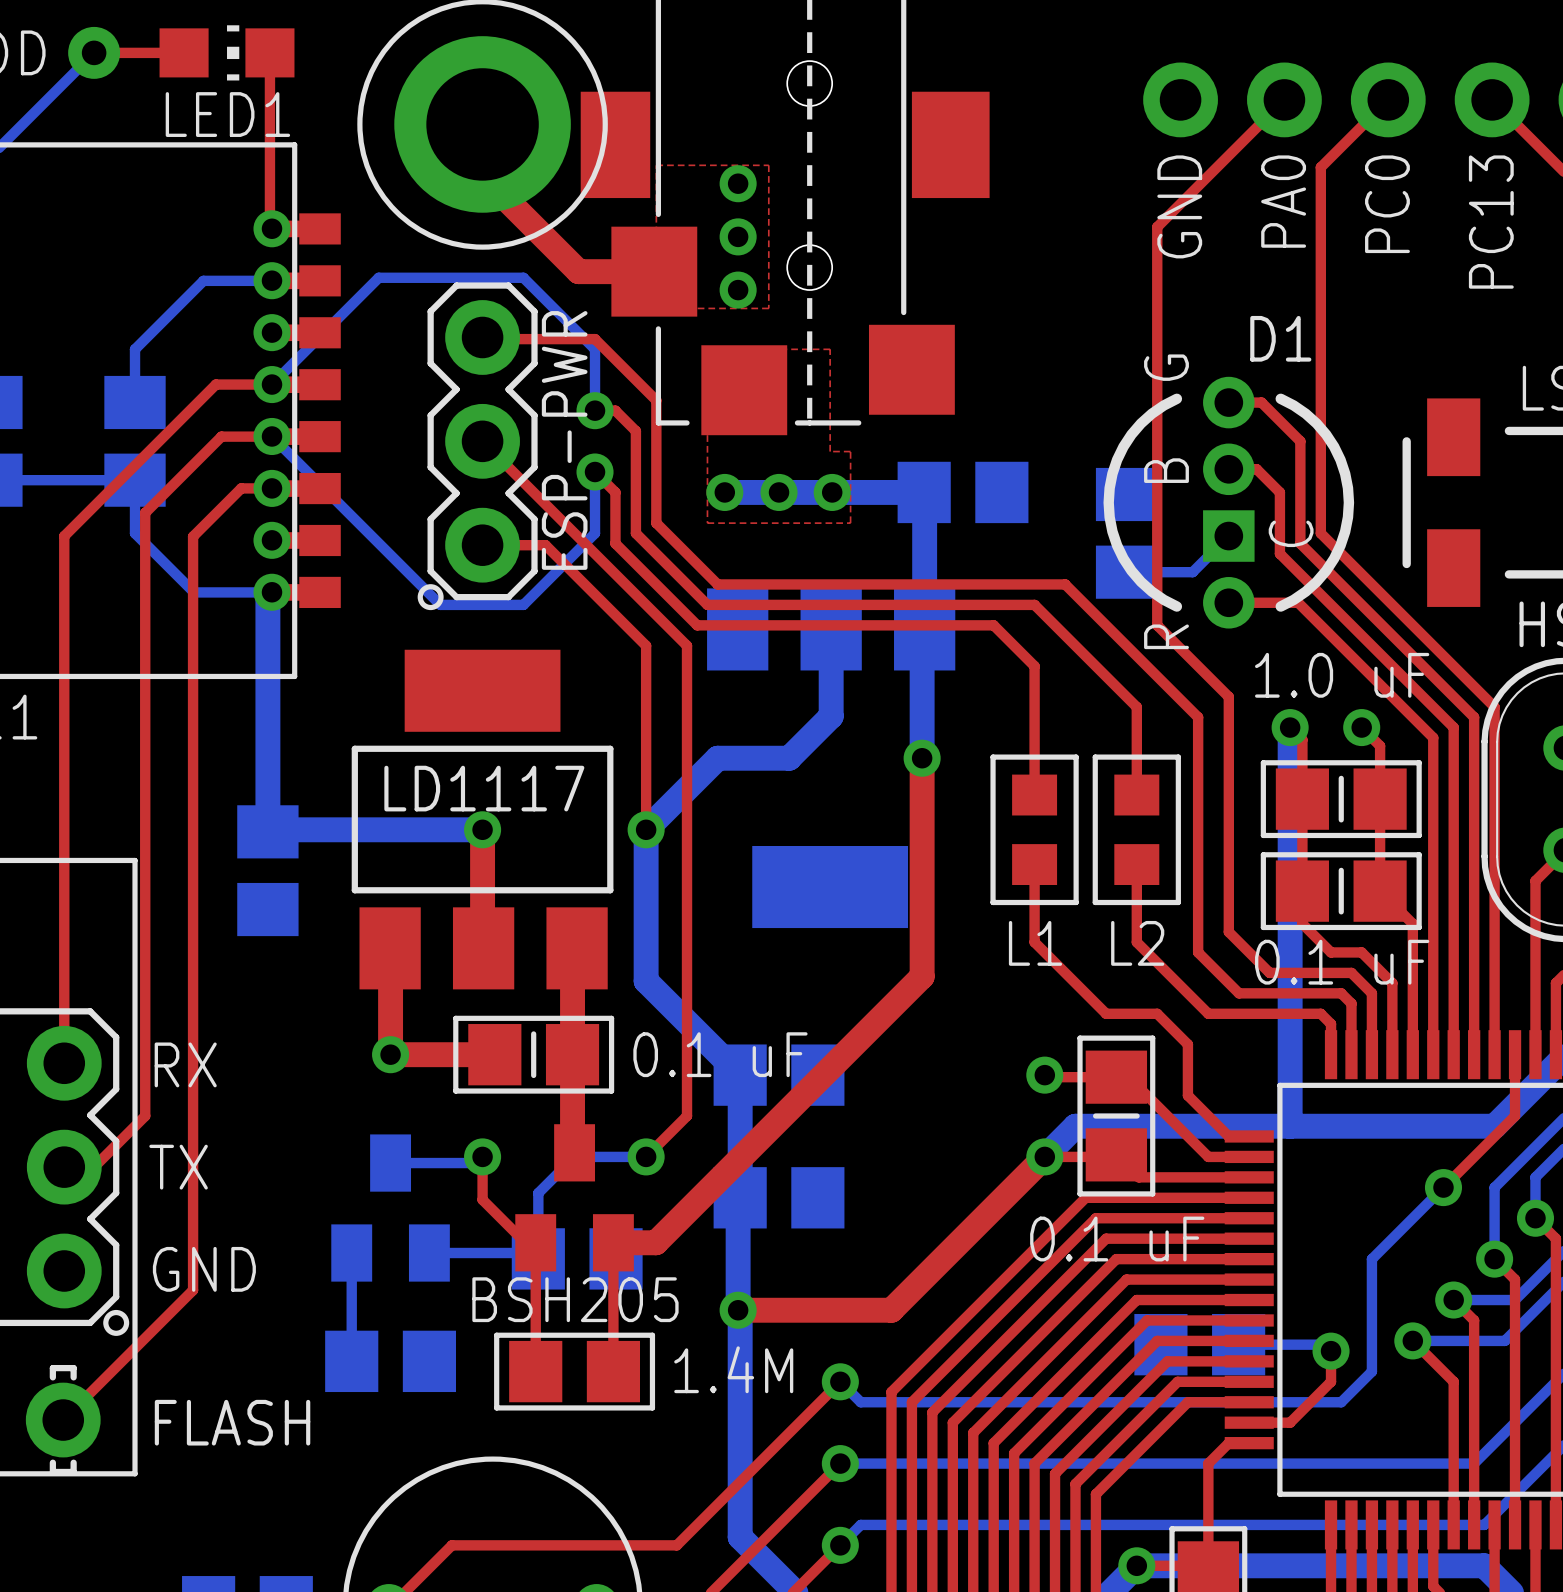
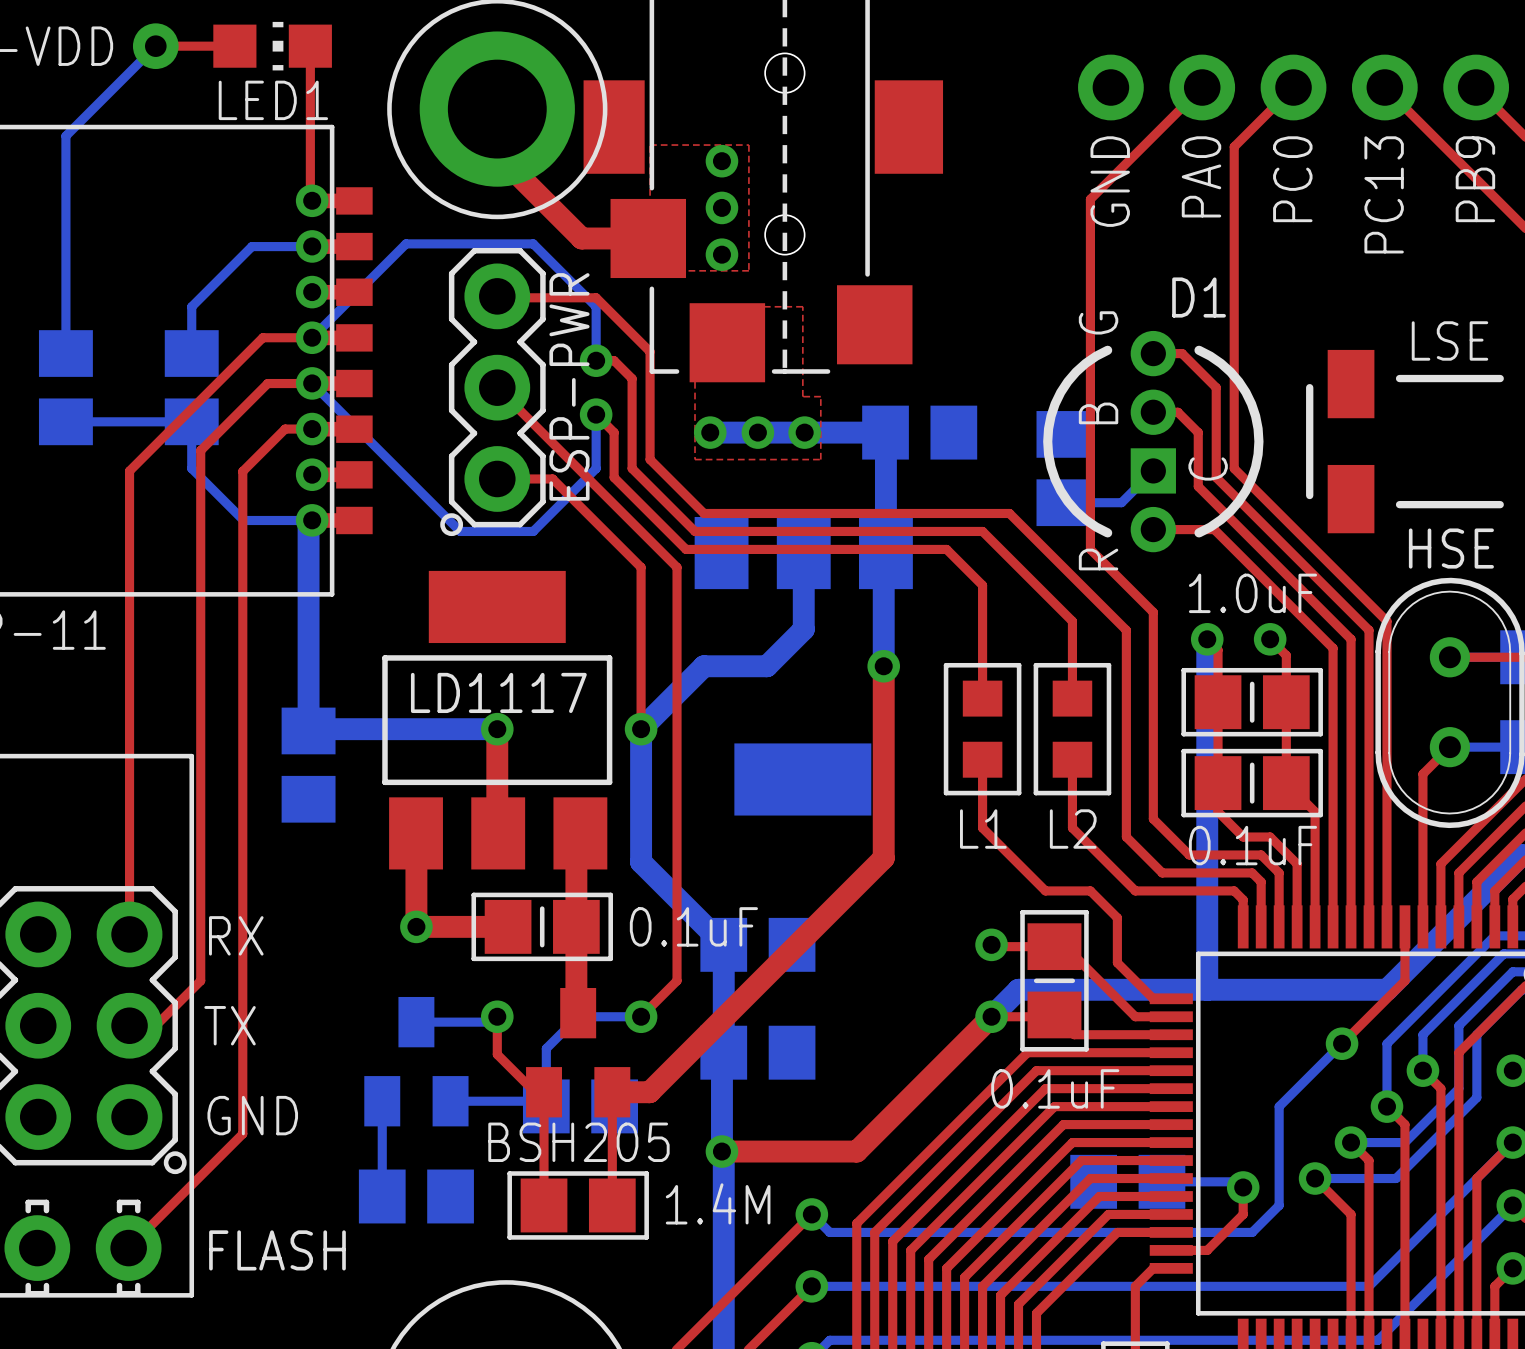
part value: 1.0 uF (1342, 675) -> 1.0uF (1252, 593)
part value: 0.1 uF (1342, 962) -> 0.1uF (1252, 845)
part value: 0.1 uF (720, 1054) -> 0.1uF (693, 926)
part value: 0.1 uF (1117, 1239) -> 0.1uF (1055, 1088)

